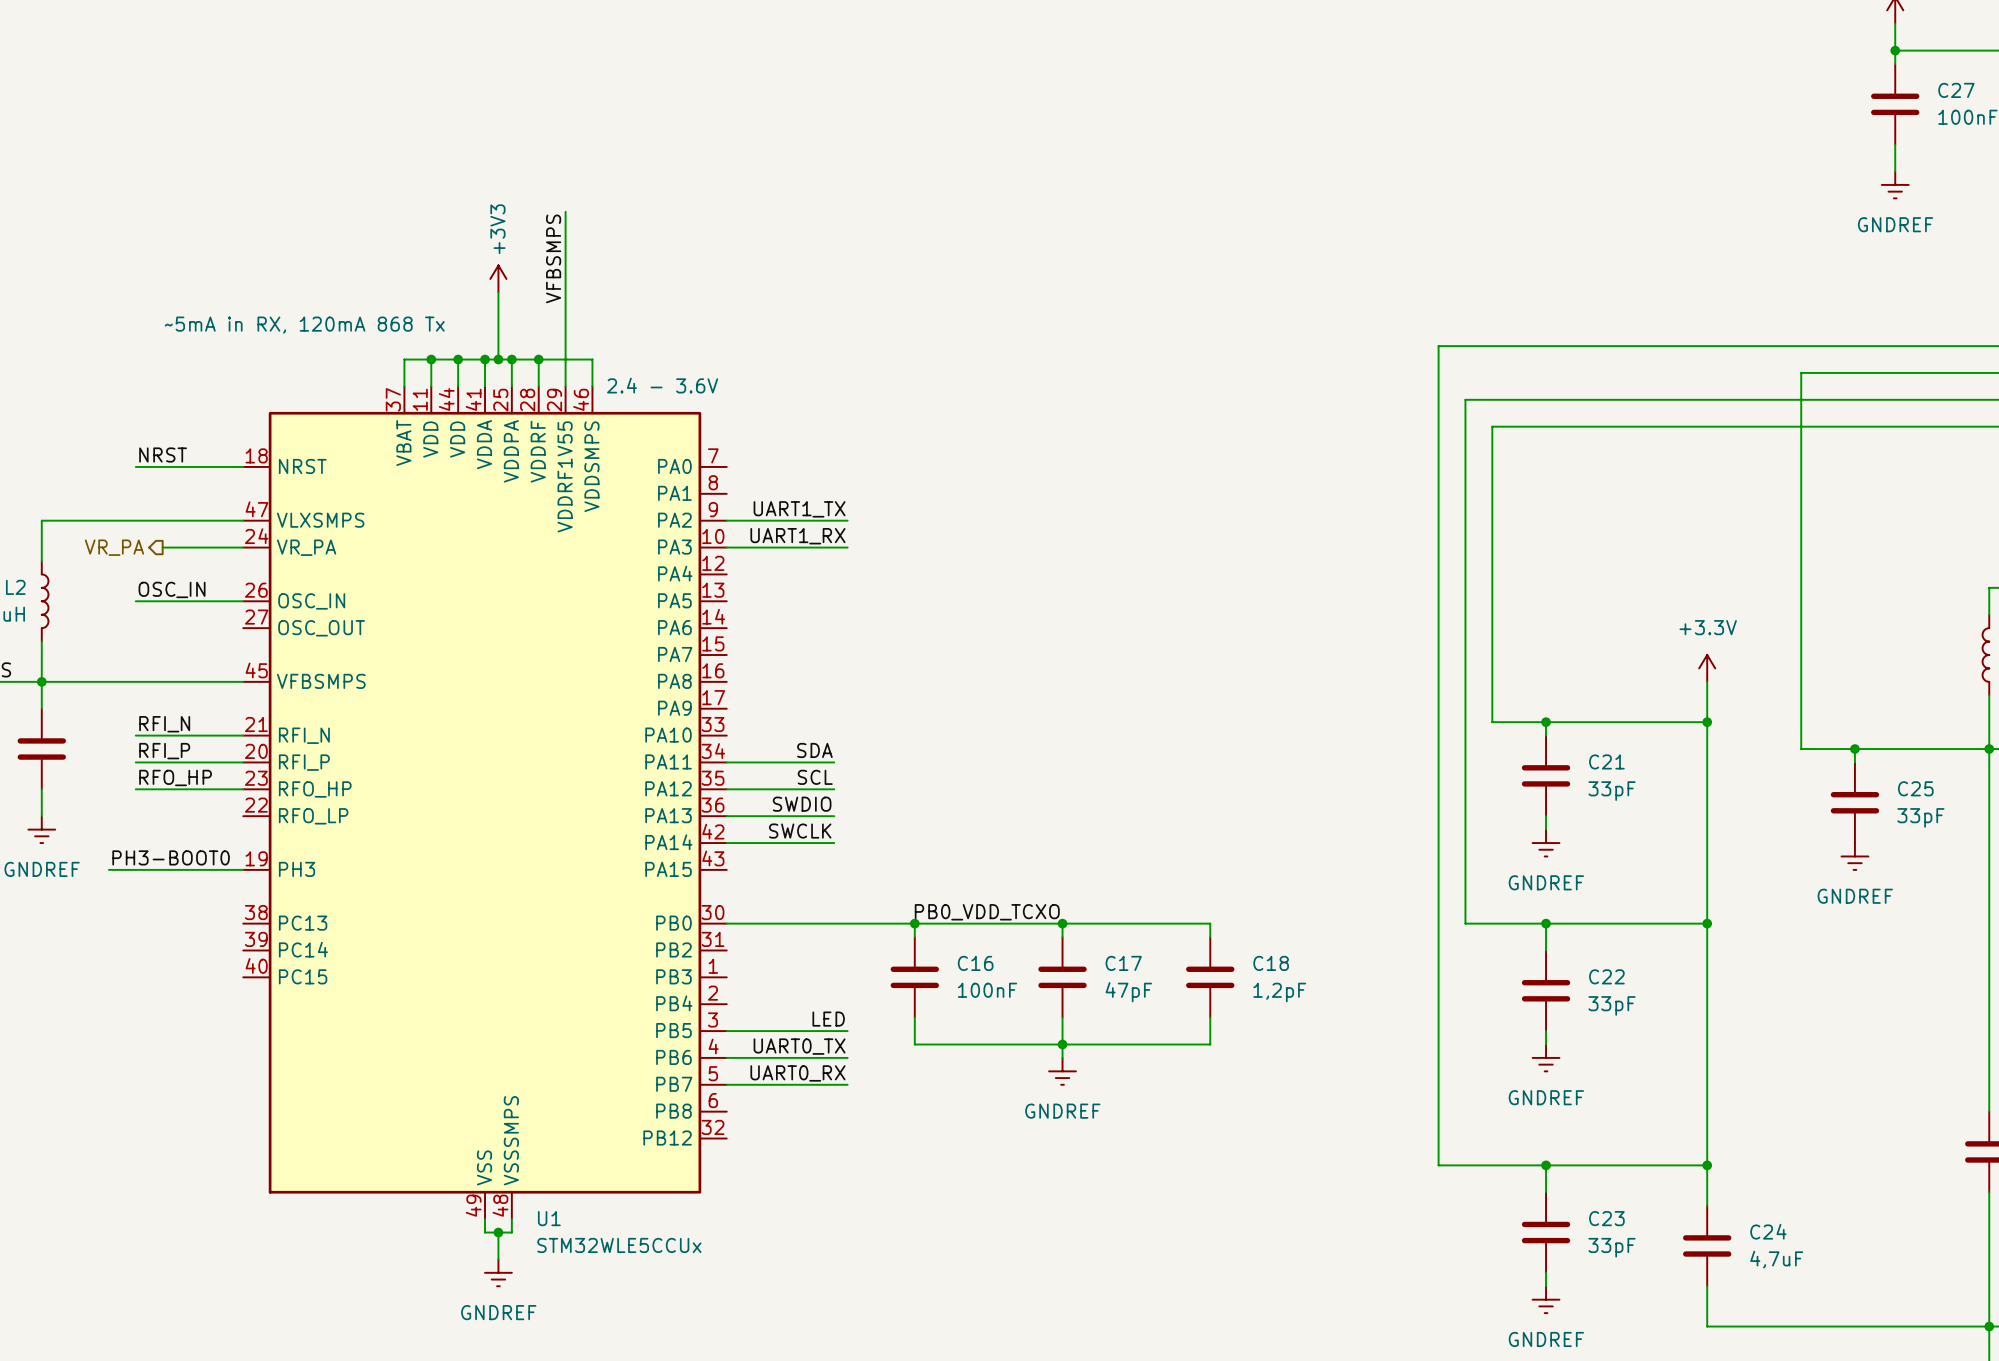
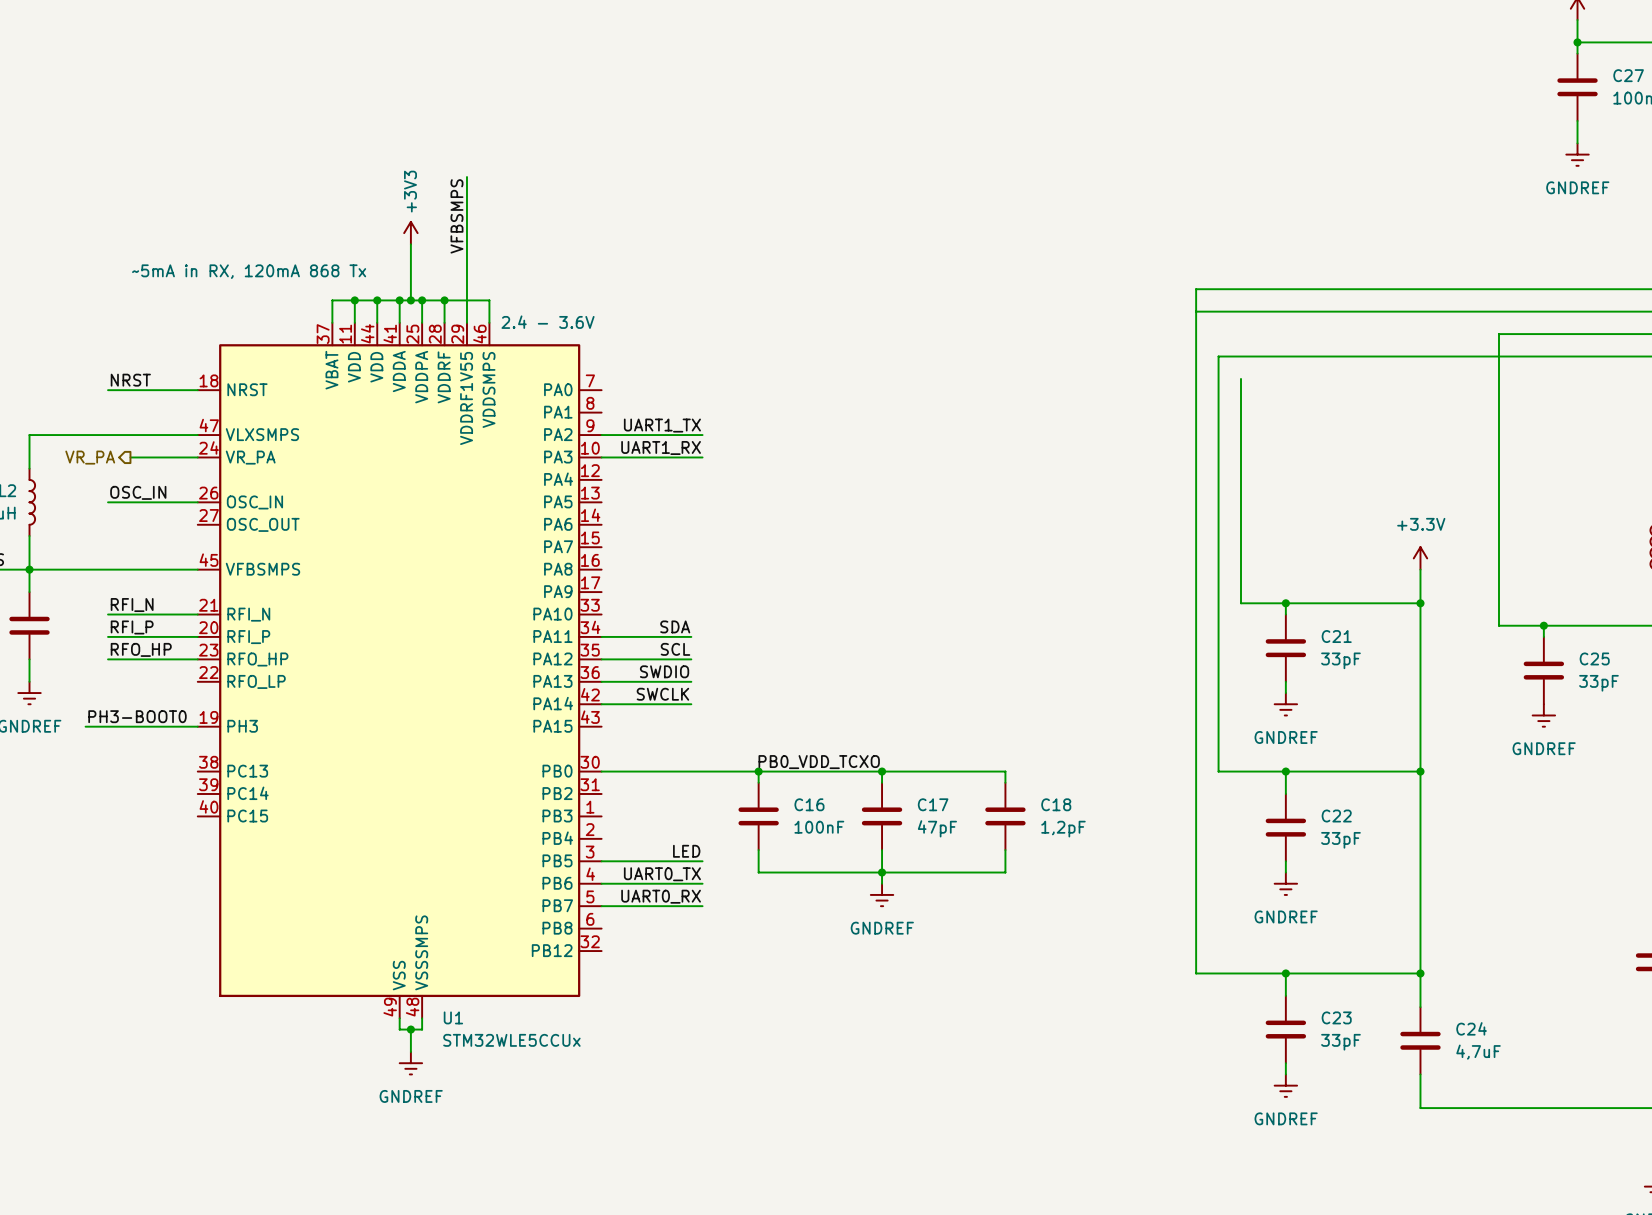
wire: (1801, 372) (1801, 399) (1465, 399) (1465, 426) -> (1499, 311) (1196, 311)
wire: (1492, 426) (1492, 453) -> (1240, 356) (1218, 356)

